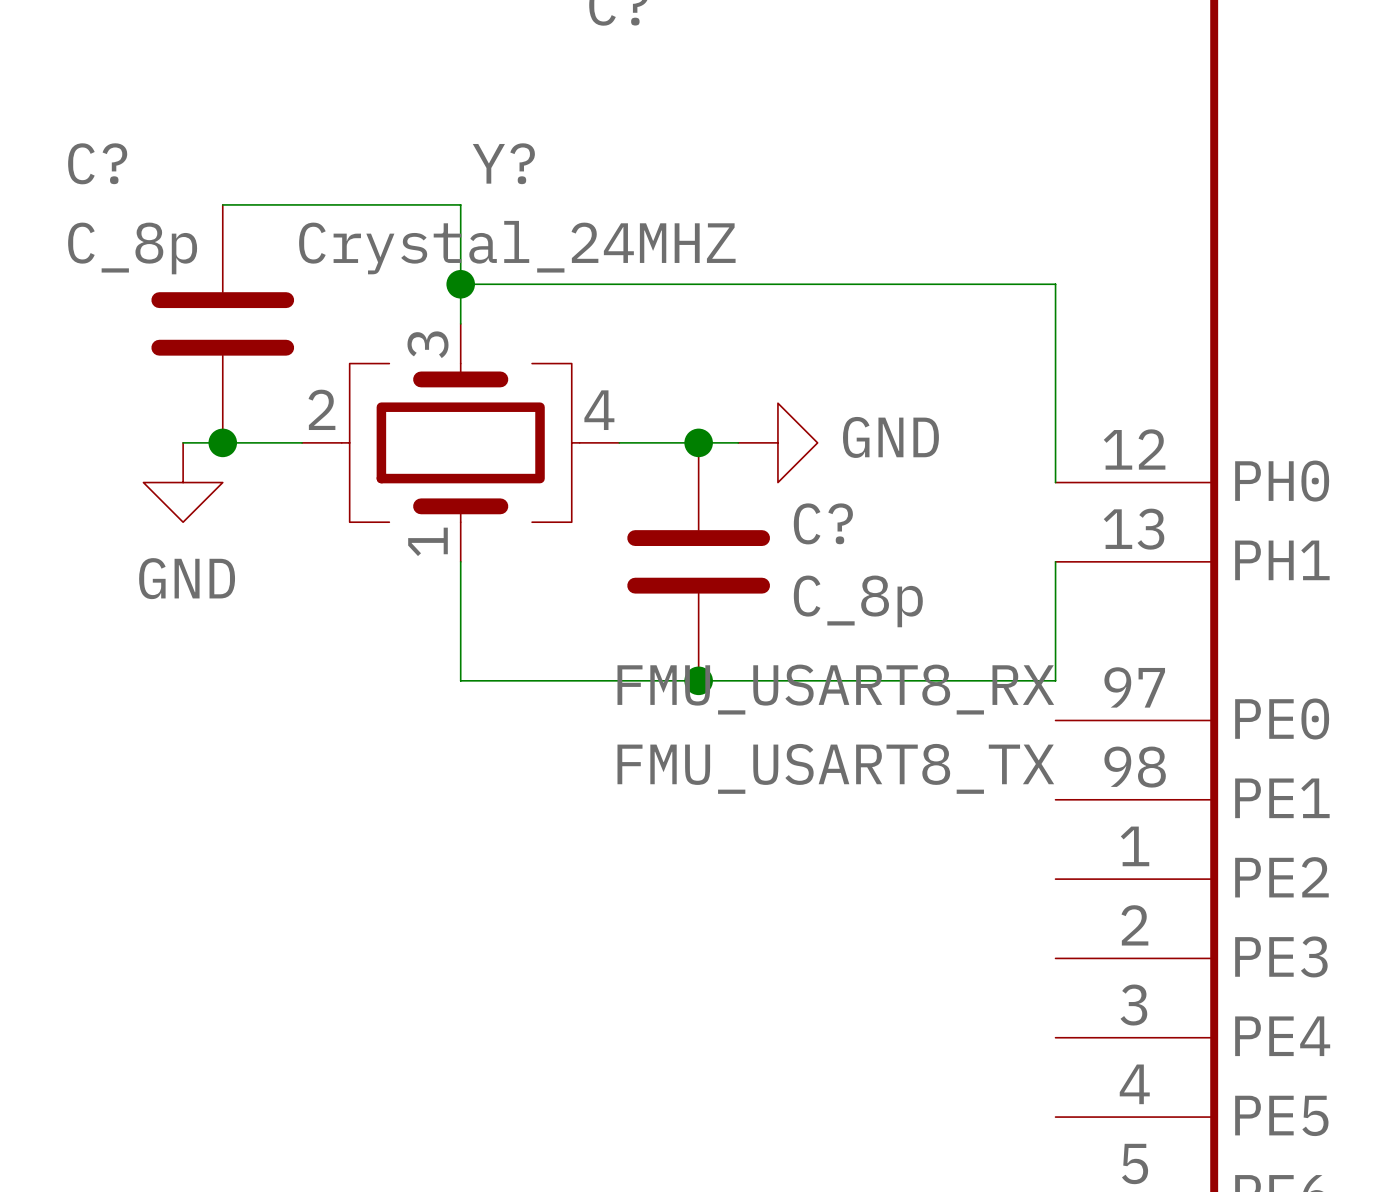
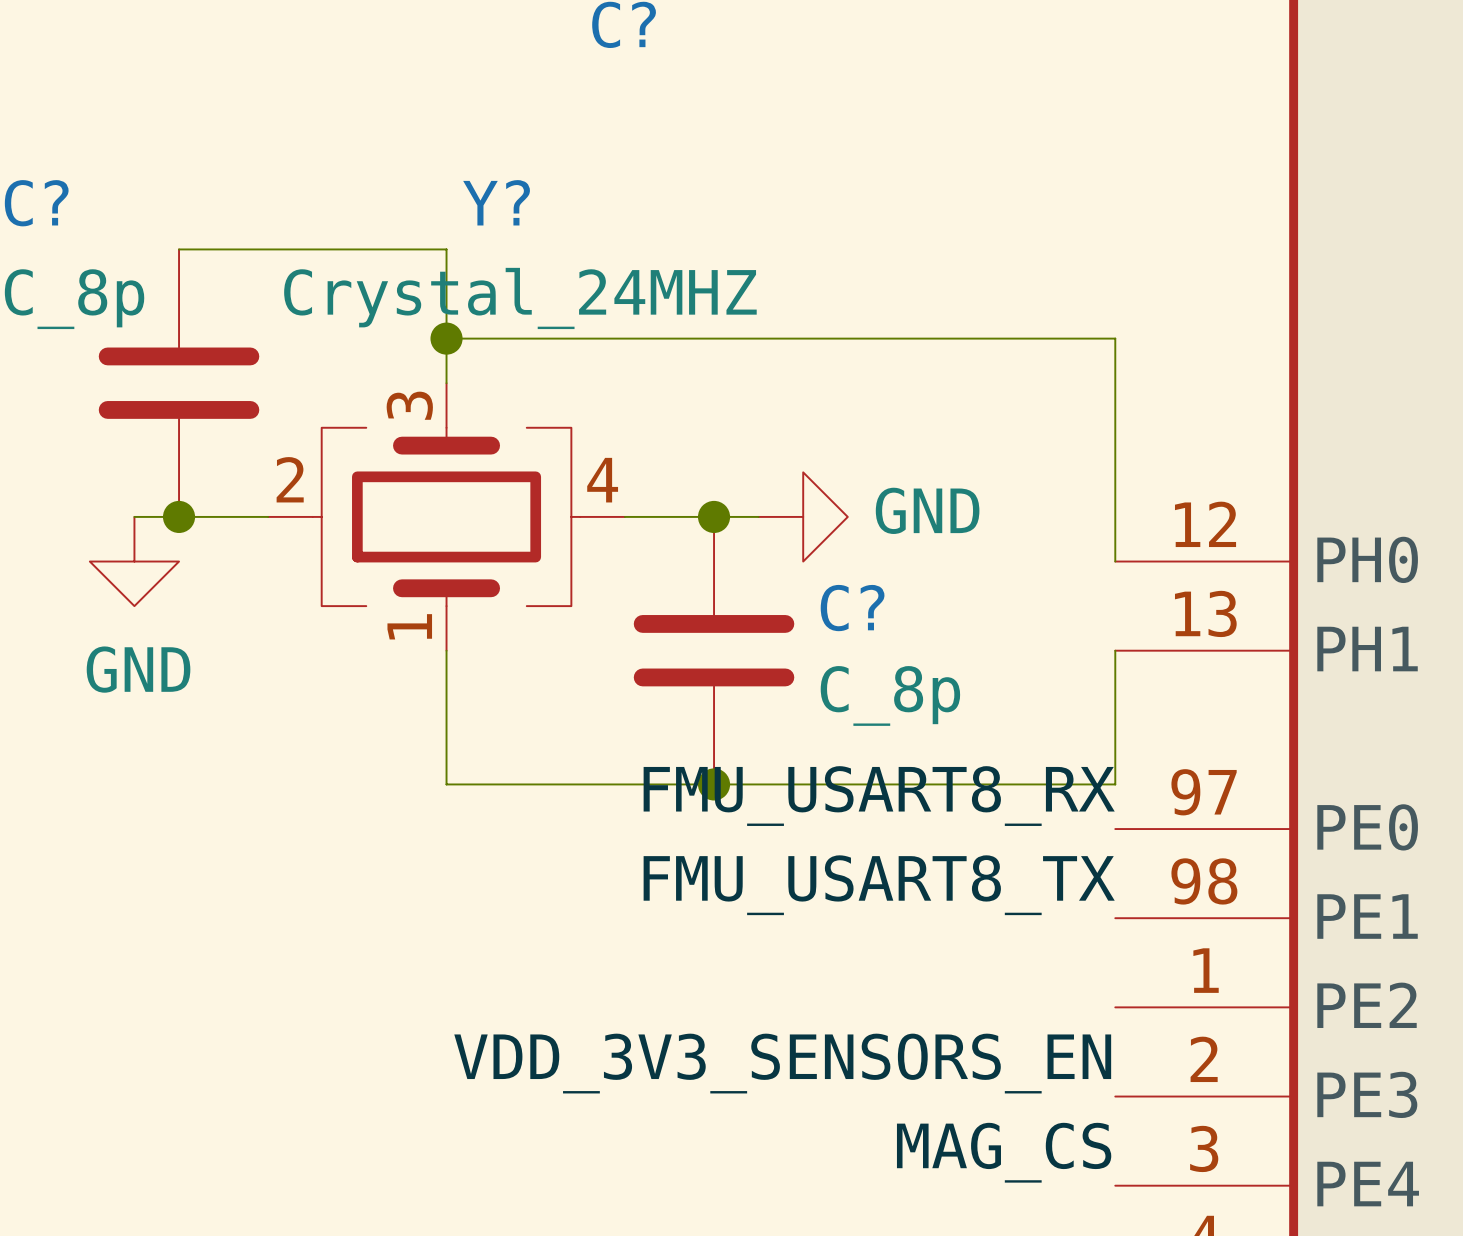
label: none -> VDD_3V3_SENSORS_EN (782, 1063)
label: none -> MAG_CS (1004, 1152)

